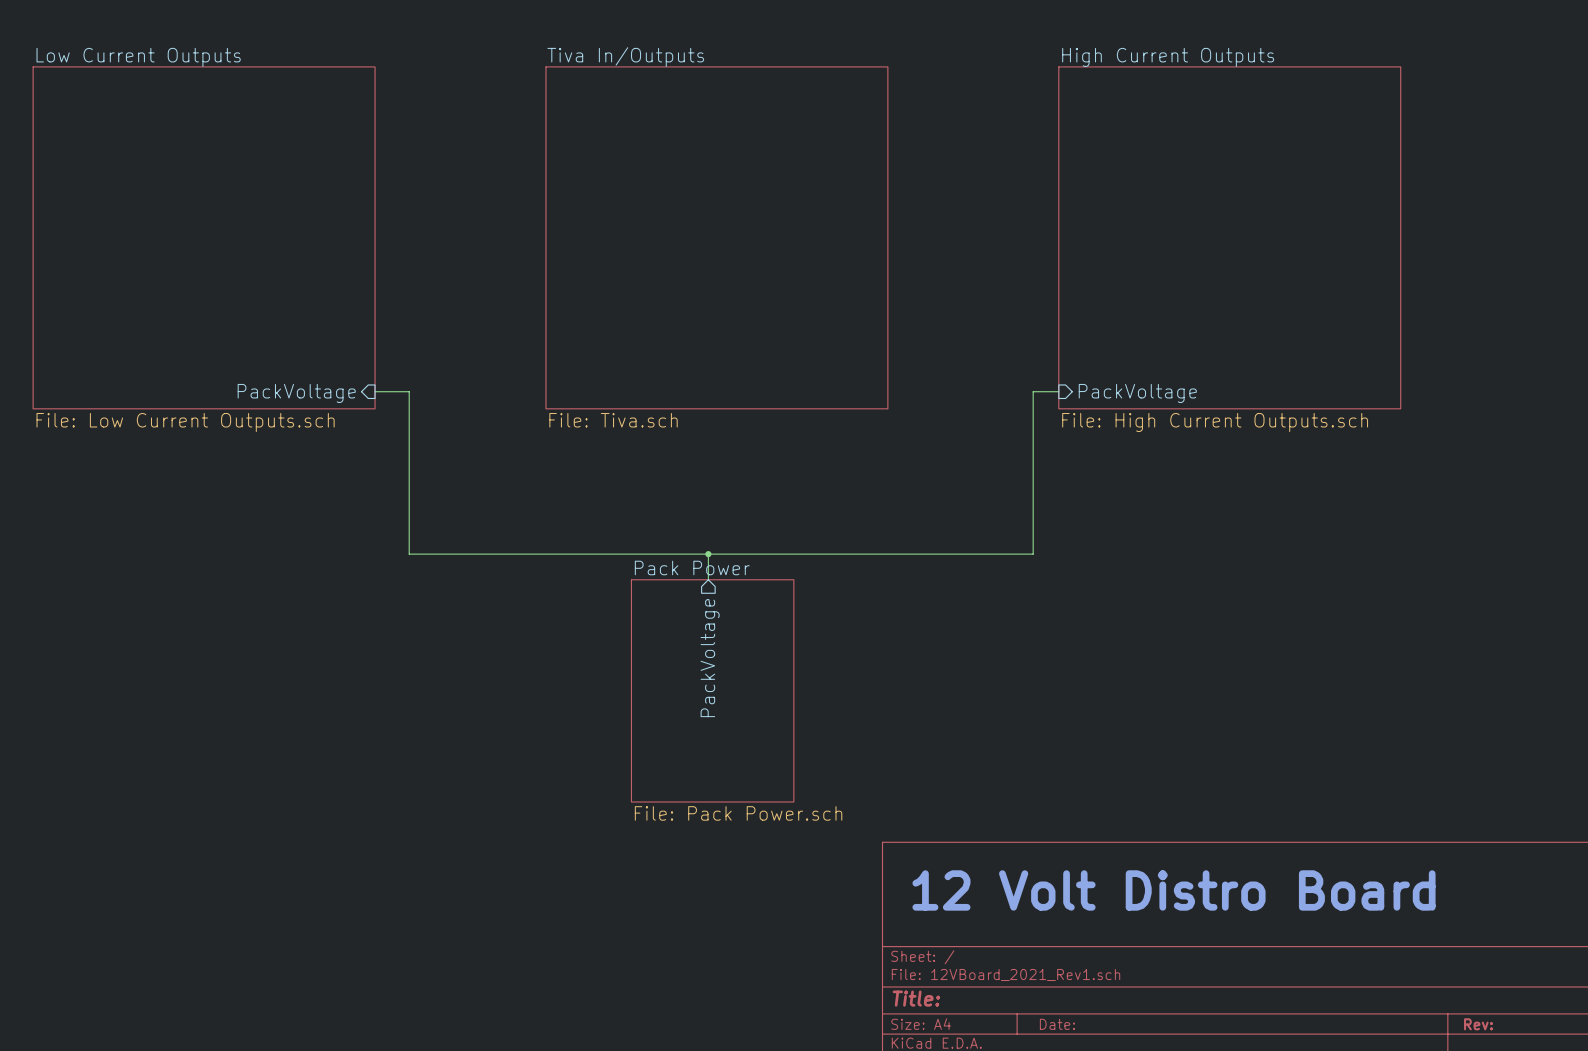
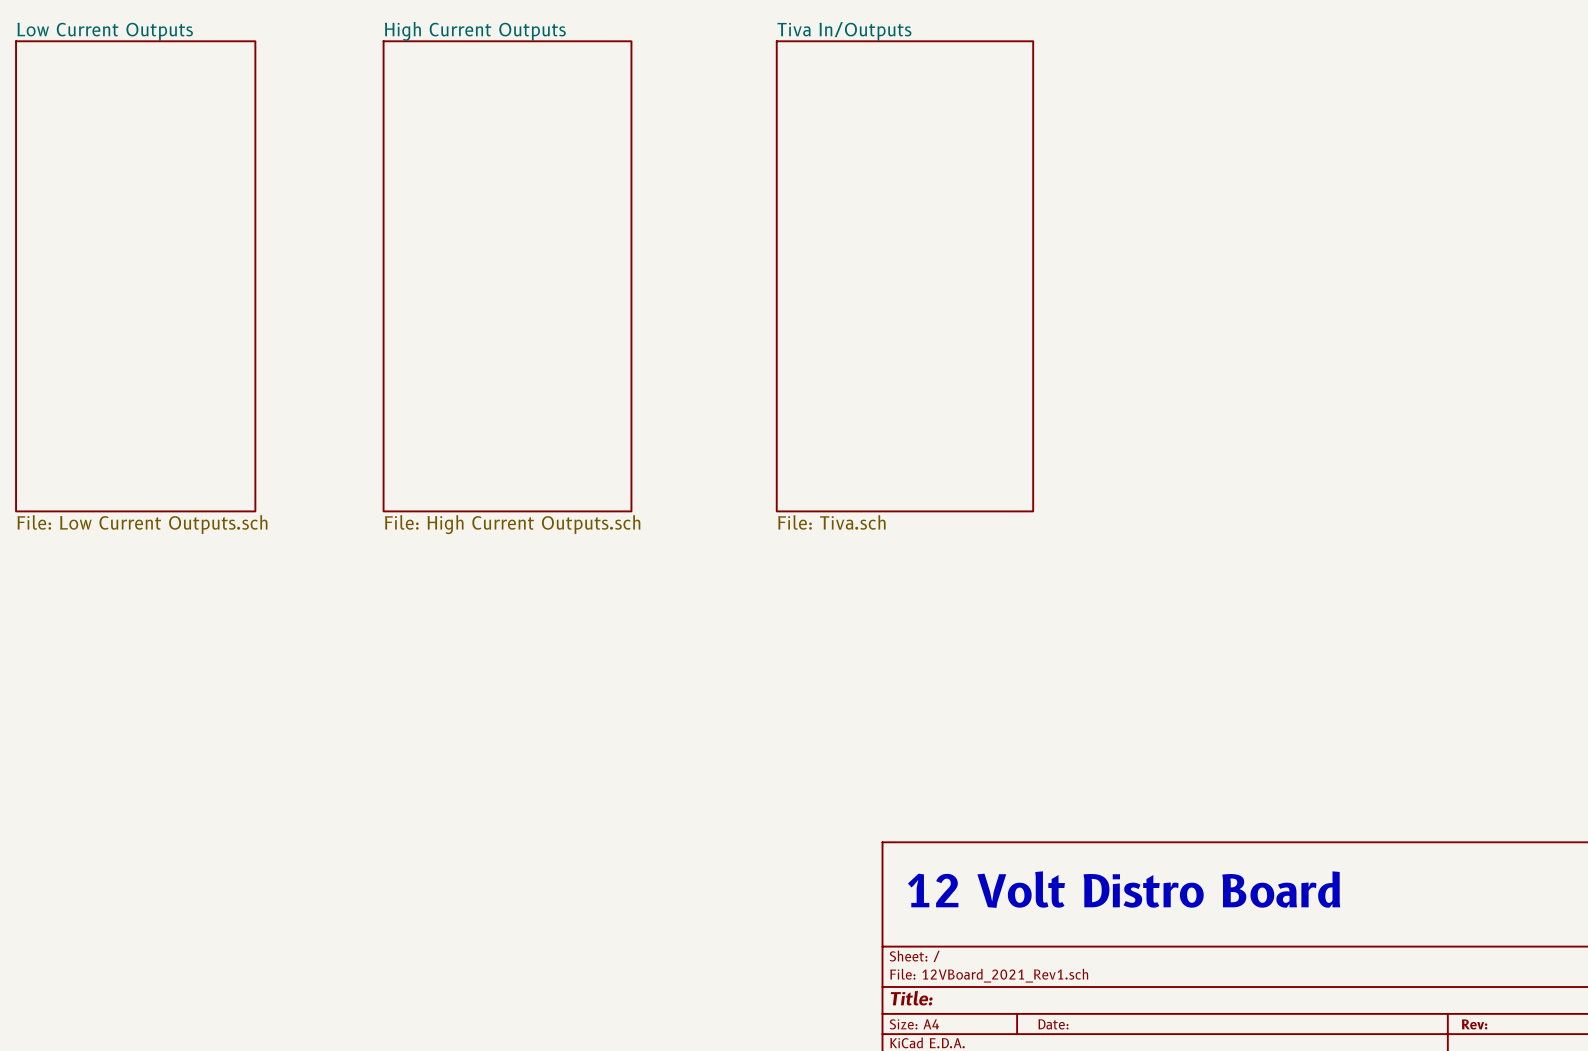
sheet Low Current Outputs: File: Low Current Outputs.sch (204, 237) -> none
sheet Tiva In/Outputs: File: Tiva.sch (716, 237) -> none
sheet High Current Outputs: File: High Current Outputs.sch (1229, 237) -> none
sheet Low Current Outputs: none -> File: Low Current Outputs.sch (135, 276)
sheet High Current Outputs: none -> File: High Current Outputs.sch (507, 276)
sheet Tiva In/Outputs: none -> File: Tiva.sch (904, 276)
wire: (375, 391) (409, 391) (409, 554) (1033, 554) (1033, 391) (1058, 391) -> none
sheet pin: PackVoltage (296, 393) -> none
sheet pin: PackVoltage (1137, 393) -> none
wire: (708, 554) (708, 579) -> none
junction: (708, 554) -> none
sheet pin: PackVoltage (710, 658) -> none
sheet Pack Power: File: Pack Power.sch (712, 690) -> none

